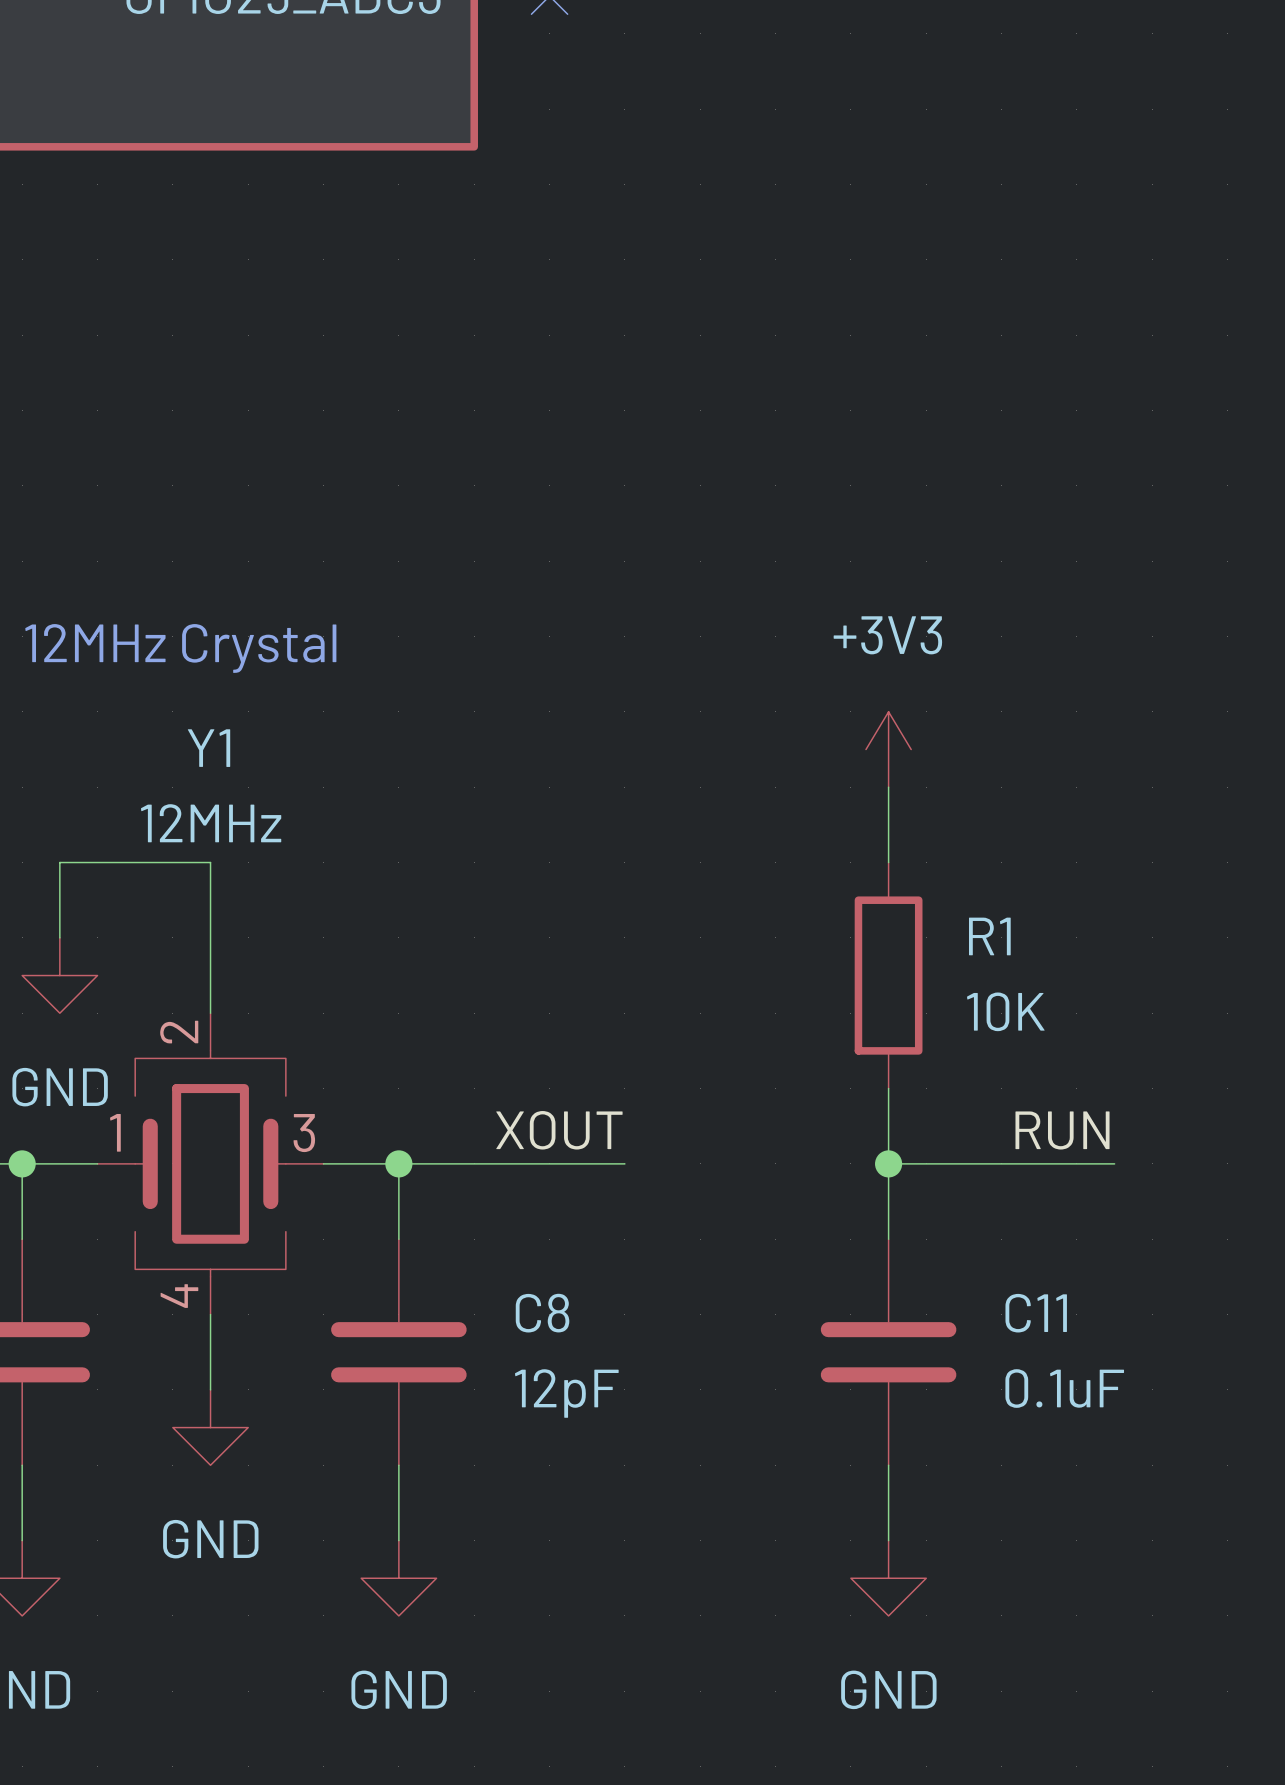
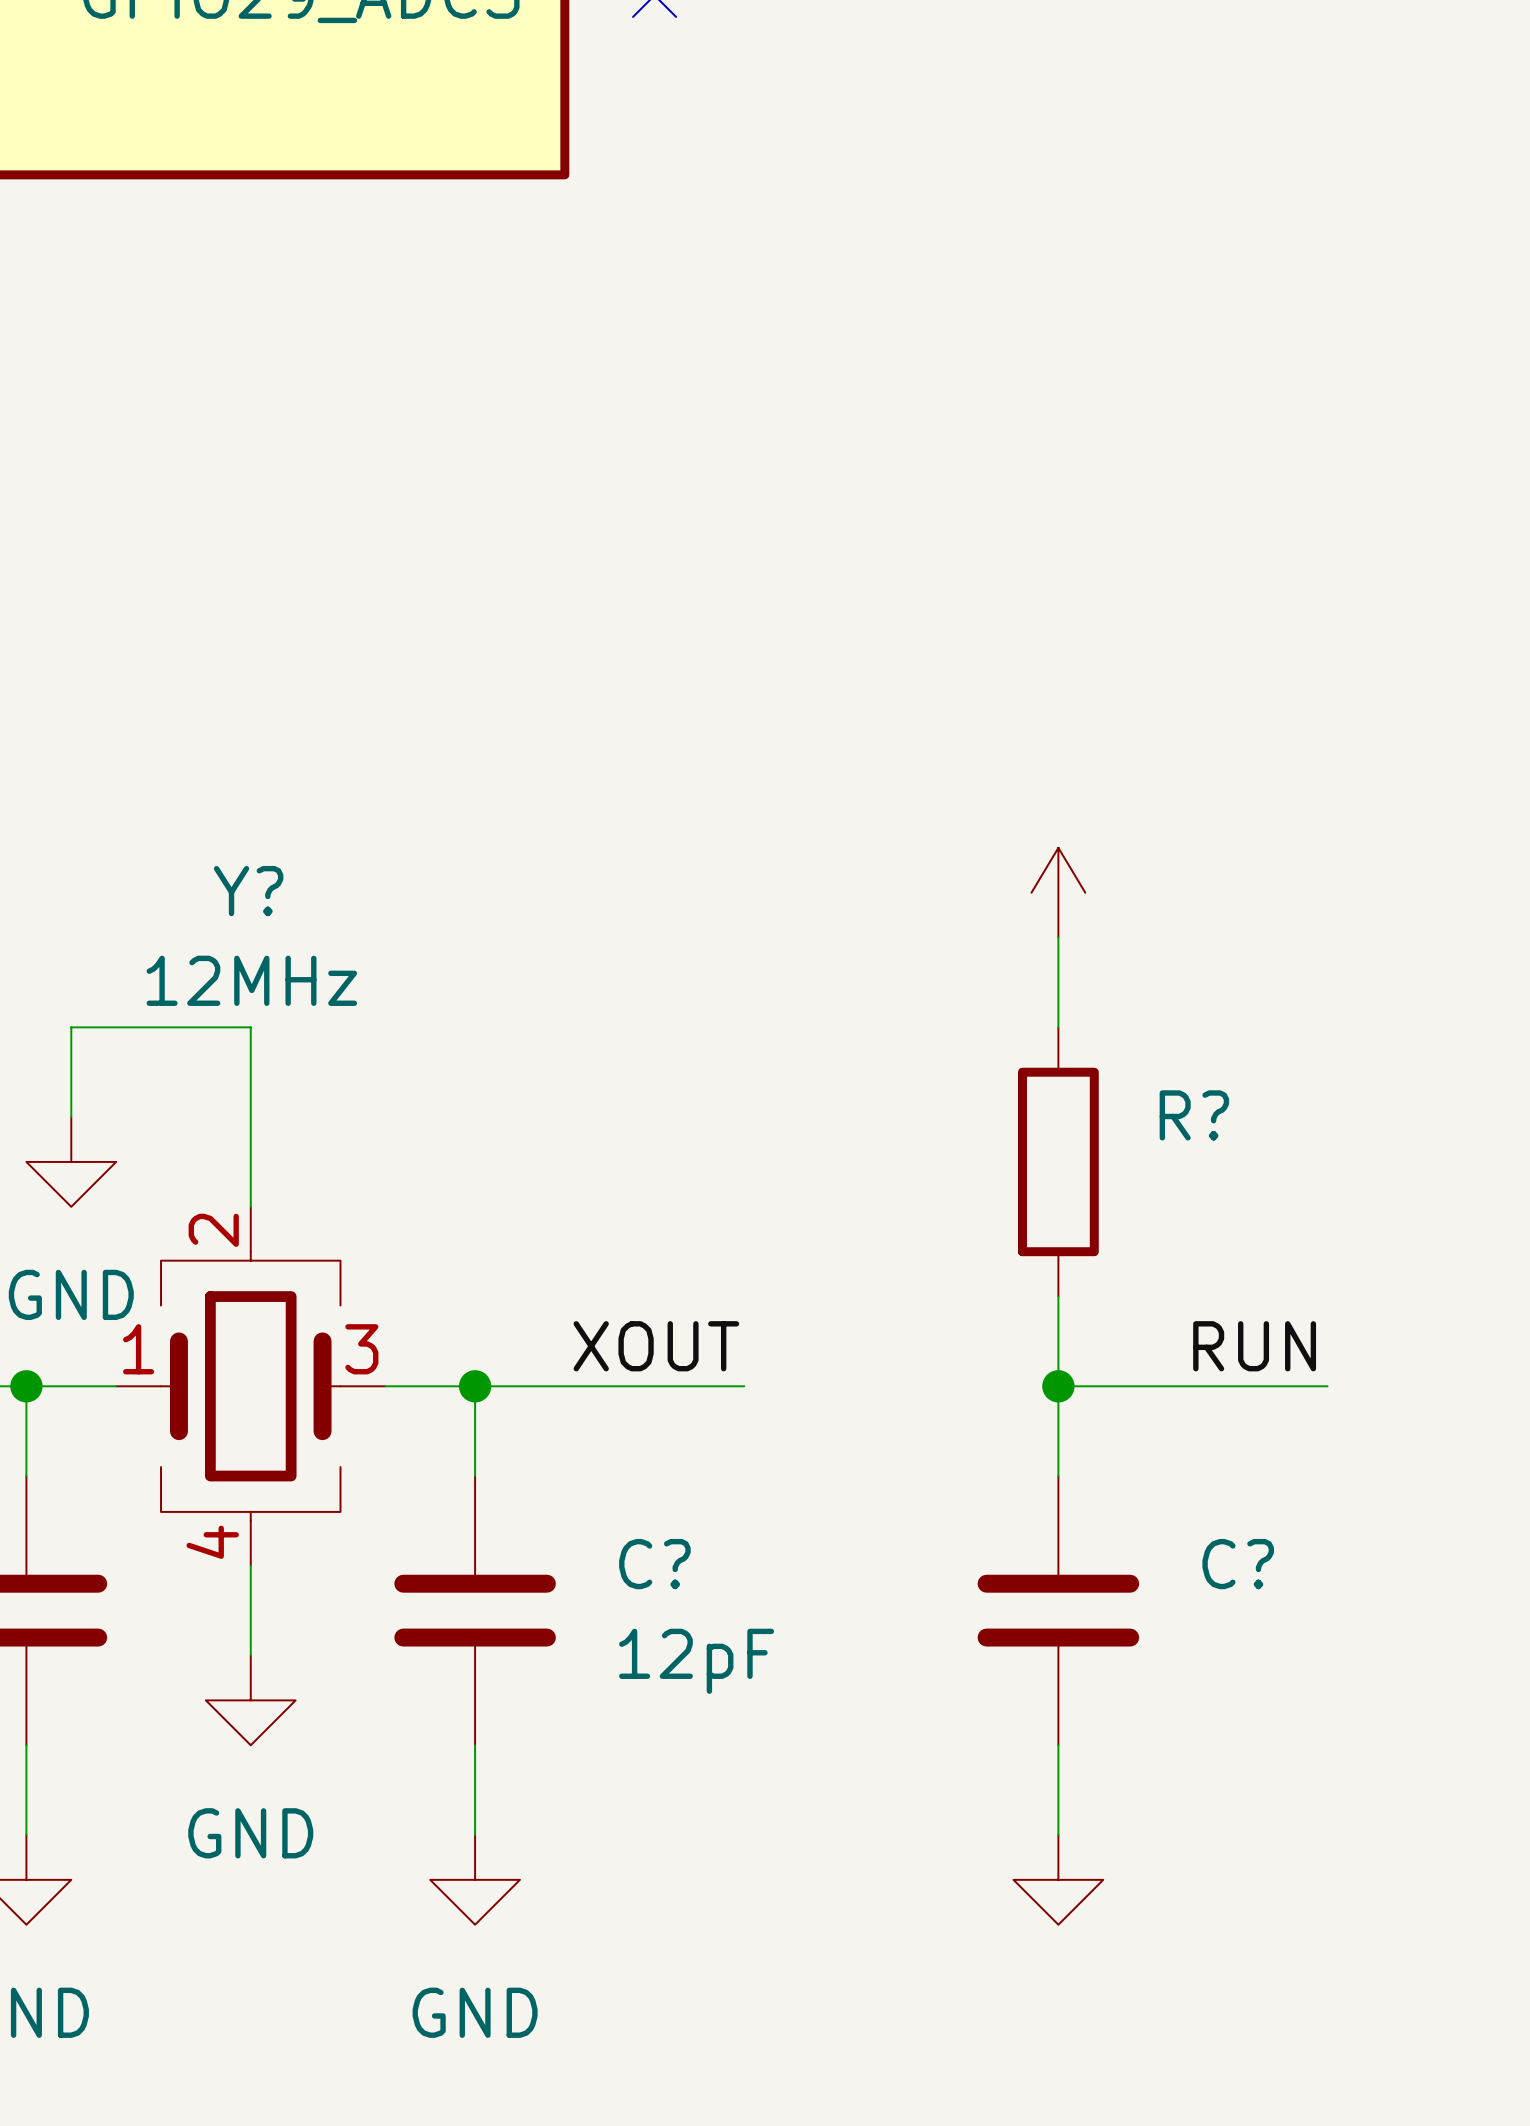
power symbol text: +3V3 (887, 635) -> none
text: 12MHz Crystal (180, 648) -> none
Y1 name: Y1 (209, 748) -> Y? (248, 891)
R1 name: R1 (989, 936) -> R? (1194, 1115)
R1 value: 10K (1005, 1011) -> none
C8 name: C8 (542, 1313) -> C? (654, 1564)
C11 name: C11 (1036, 1313) -> C? (1238, 1564)
C11 value: 0.1uF (1064, 1388) -> none
power symbol text: GND (888, 1689) -> none

